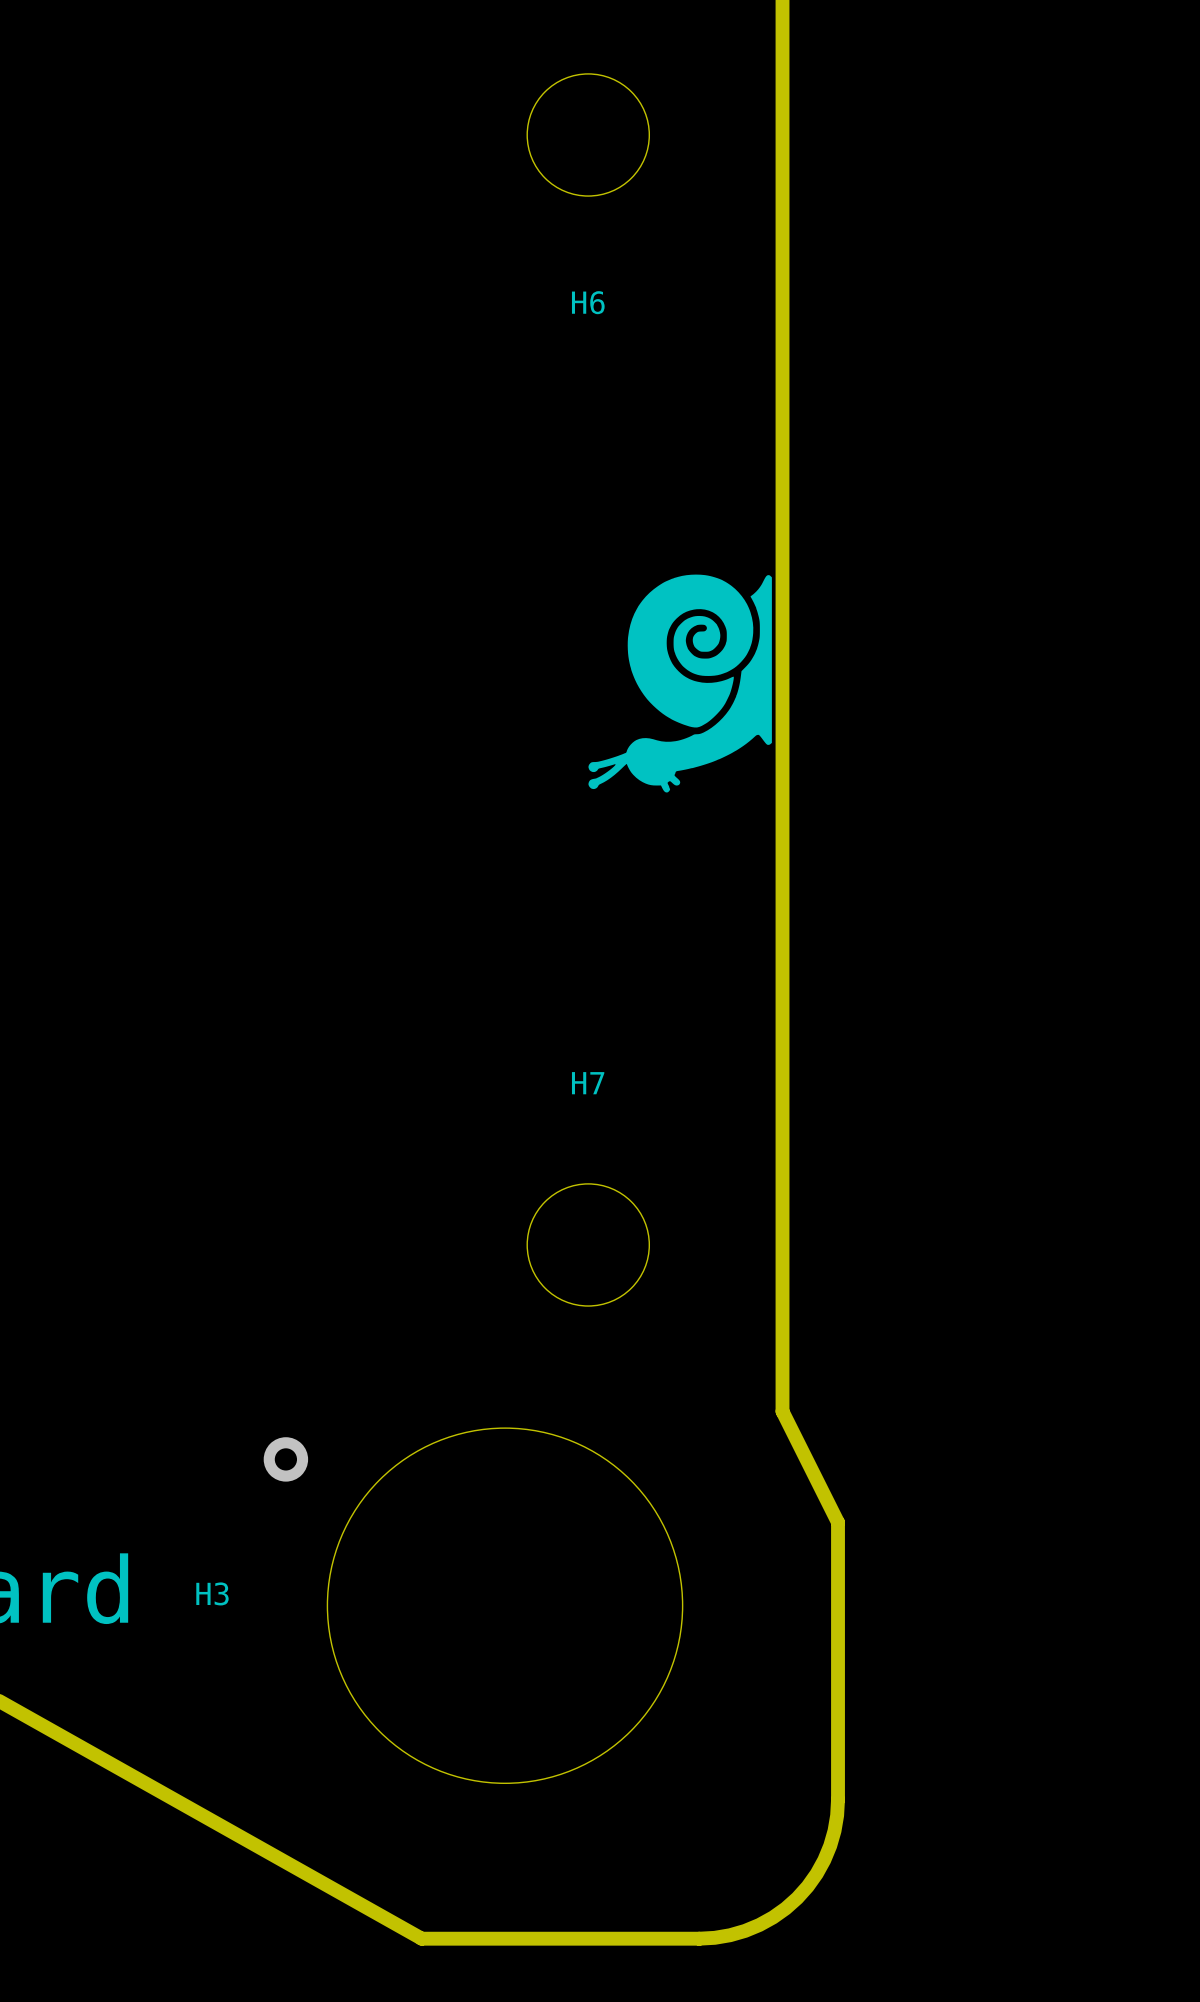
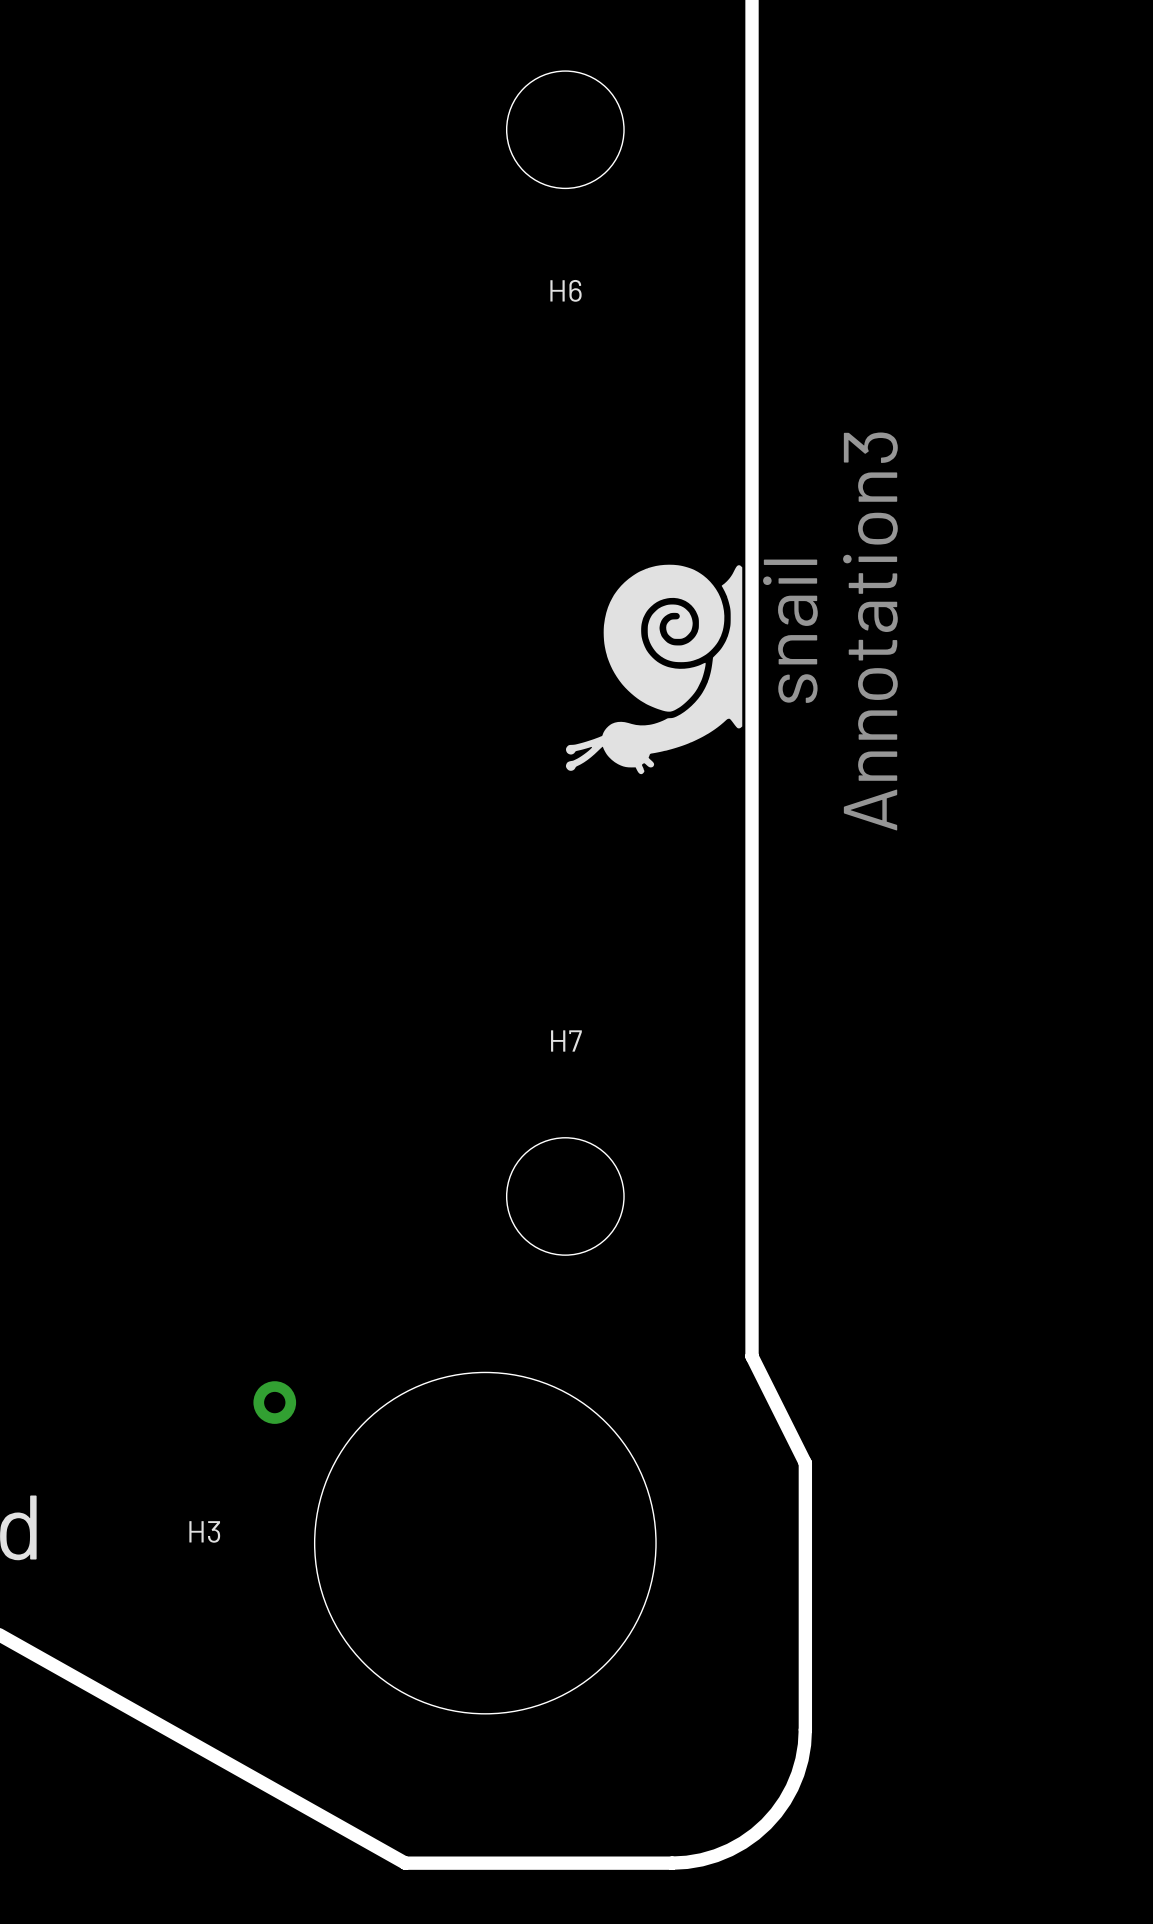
drawing: [588, 574, 772, 793] -> none
Annotation3: none -> snail (654, 669)

